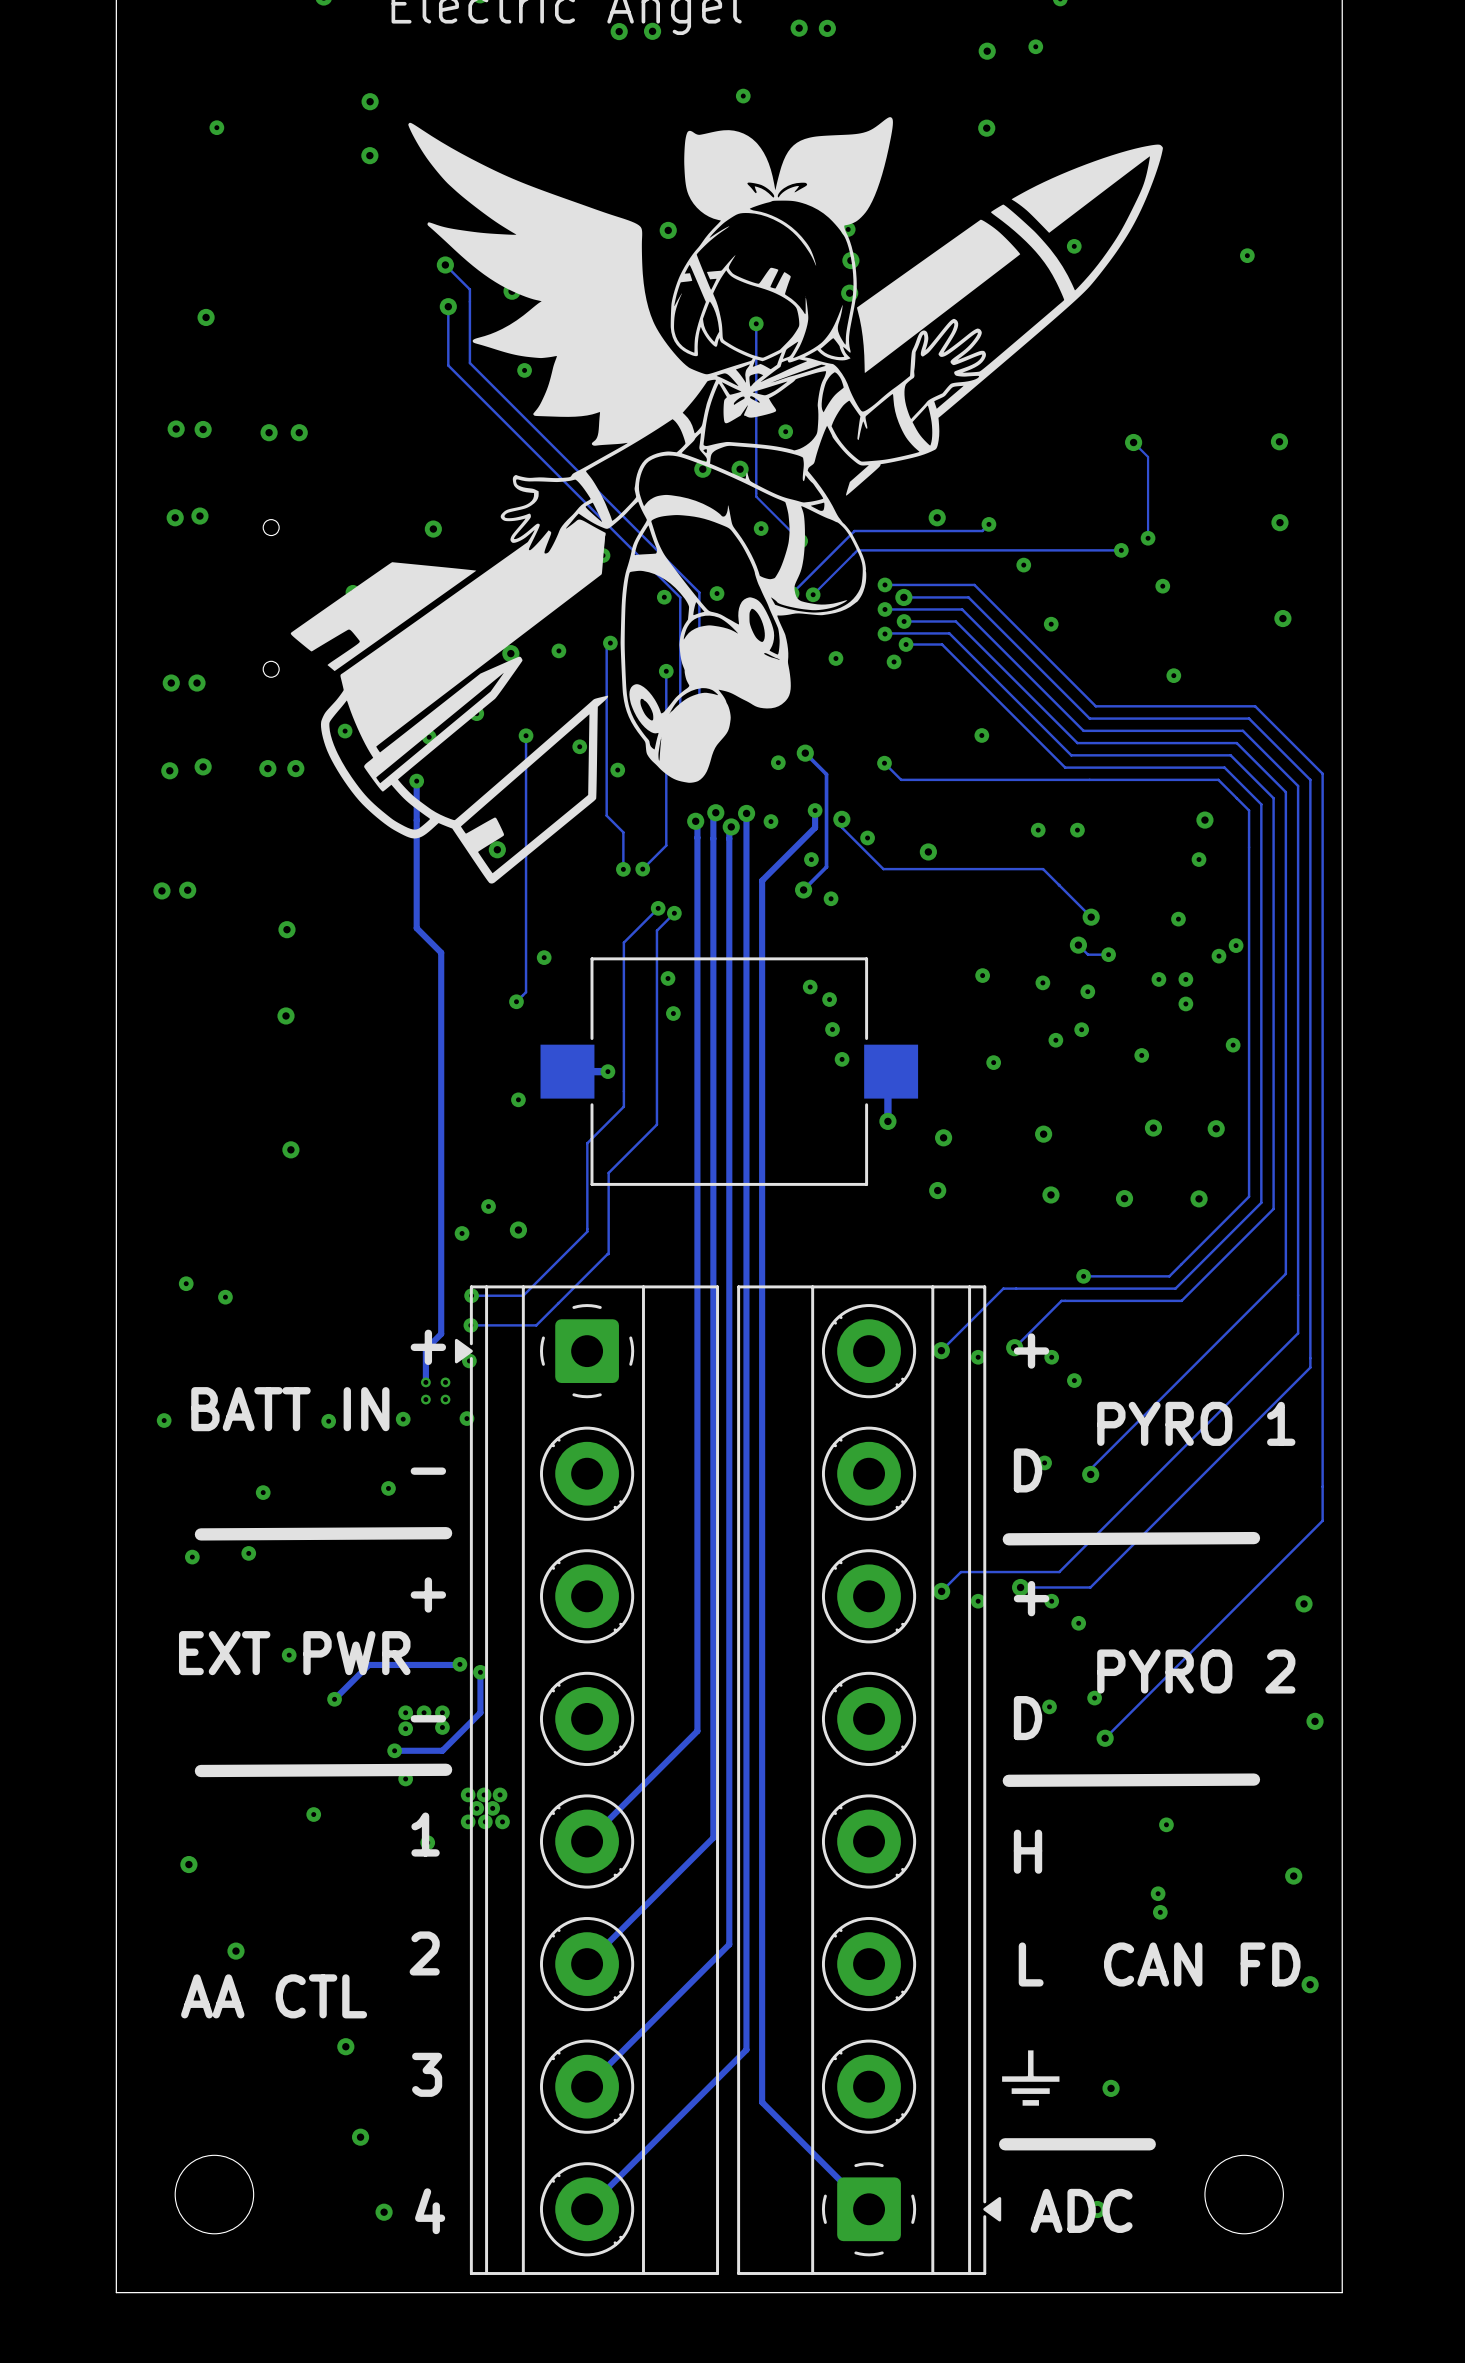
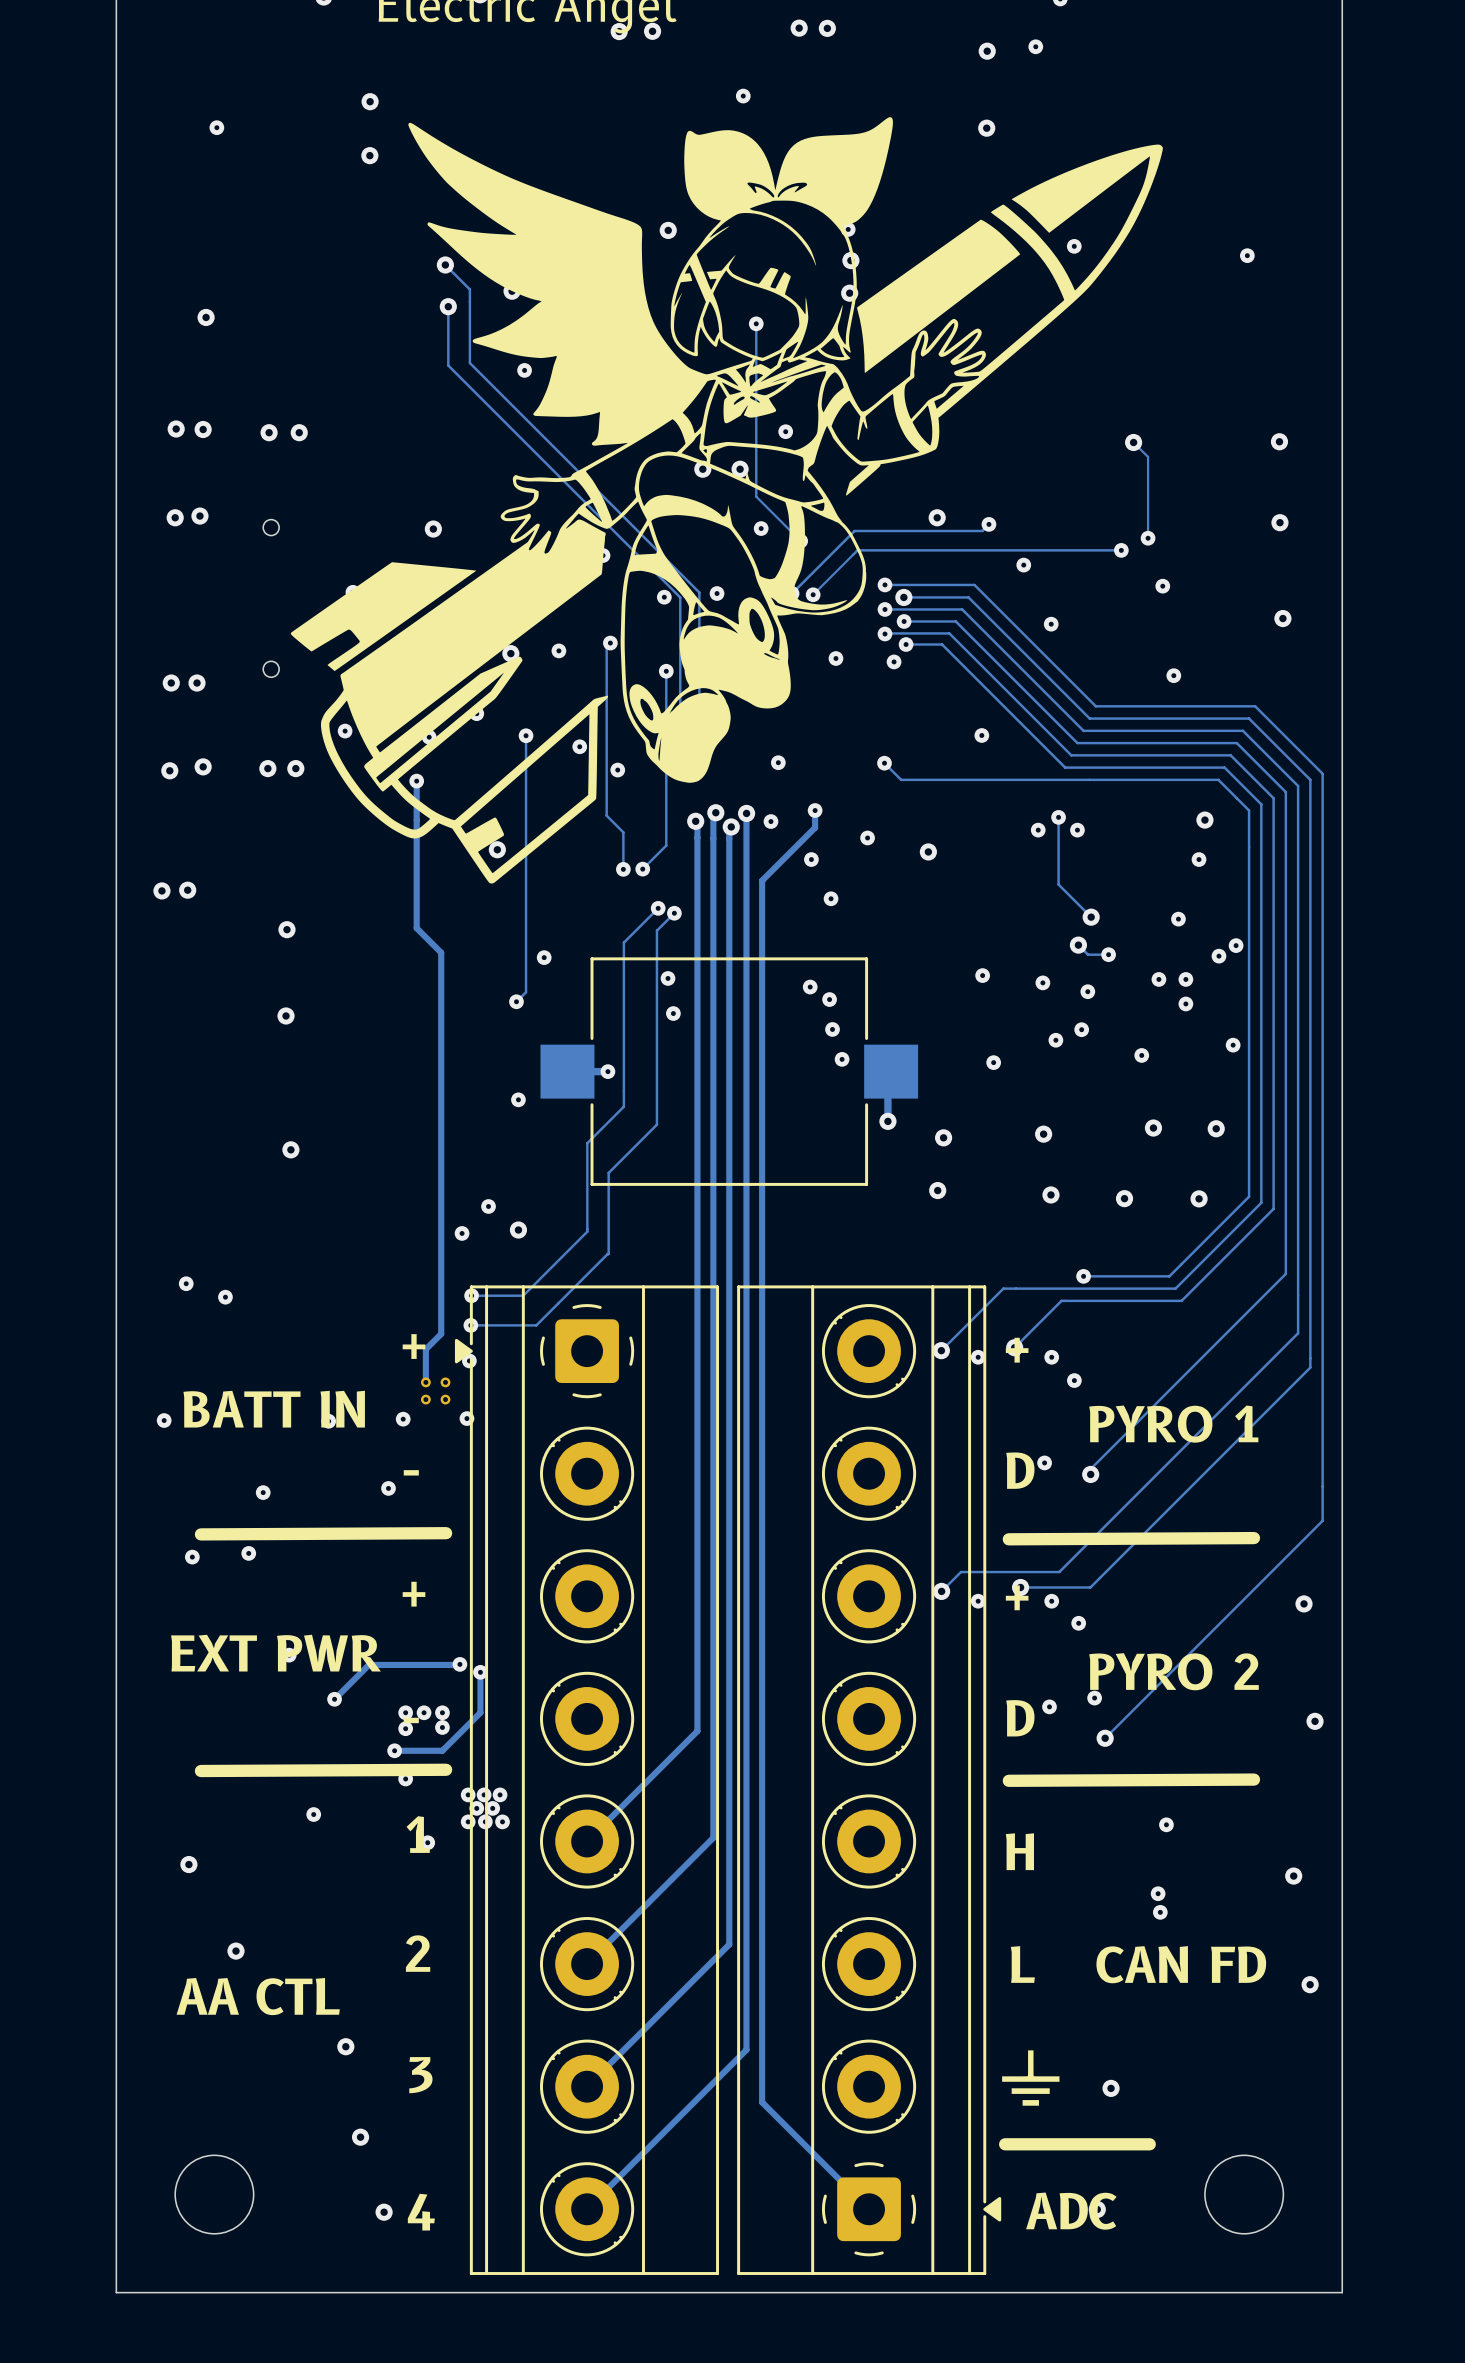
track: (805, 753) (826, 774) (826, 867) (803, 889) -> none
via: (805, 753) -> none
via: none -> (1058, 817)
track: (841, 819) (841, 827) (883, 869) (1043, 869) (1058, 884) -> (1058, 817) (1058, 884)
via: (841, 819) -> none
via: (803, 889) -> none

